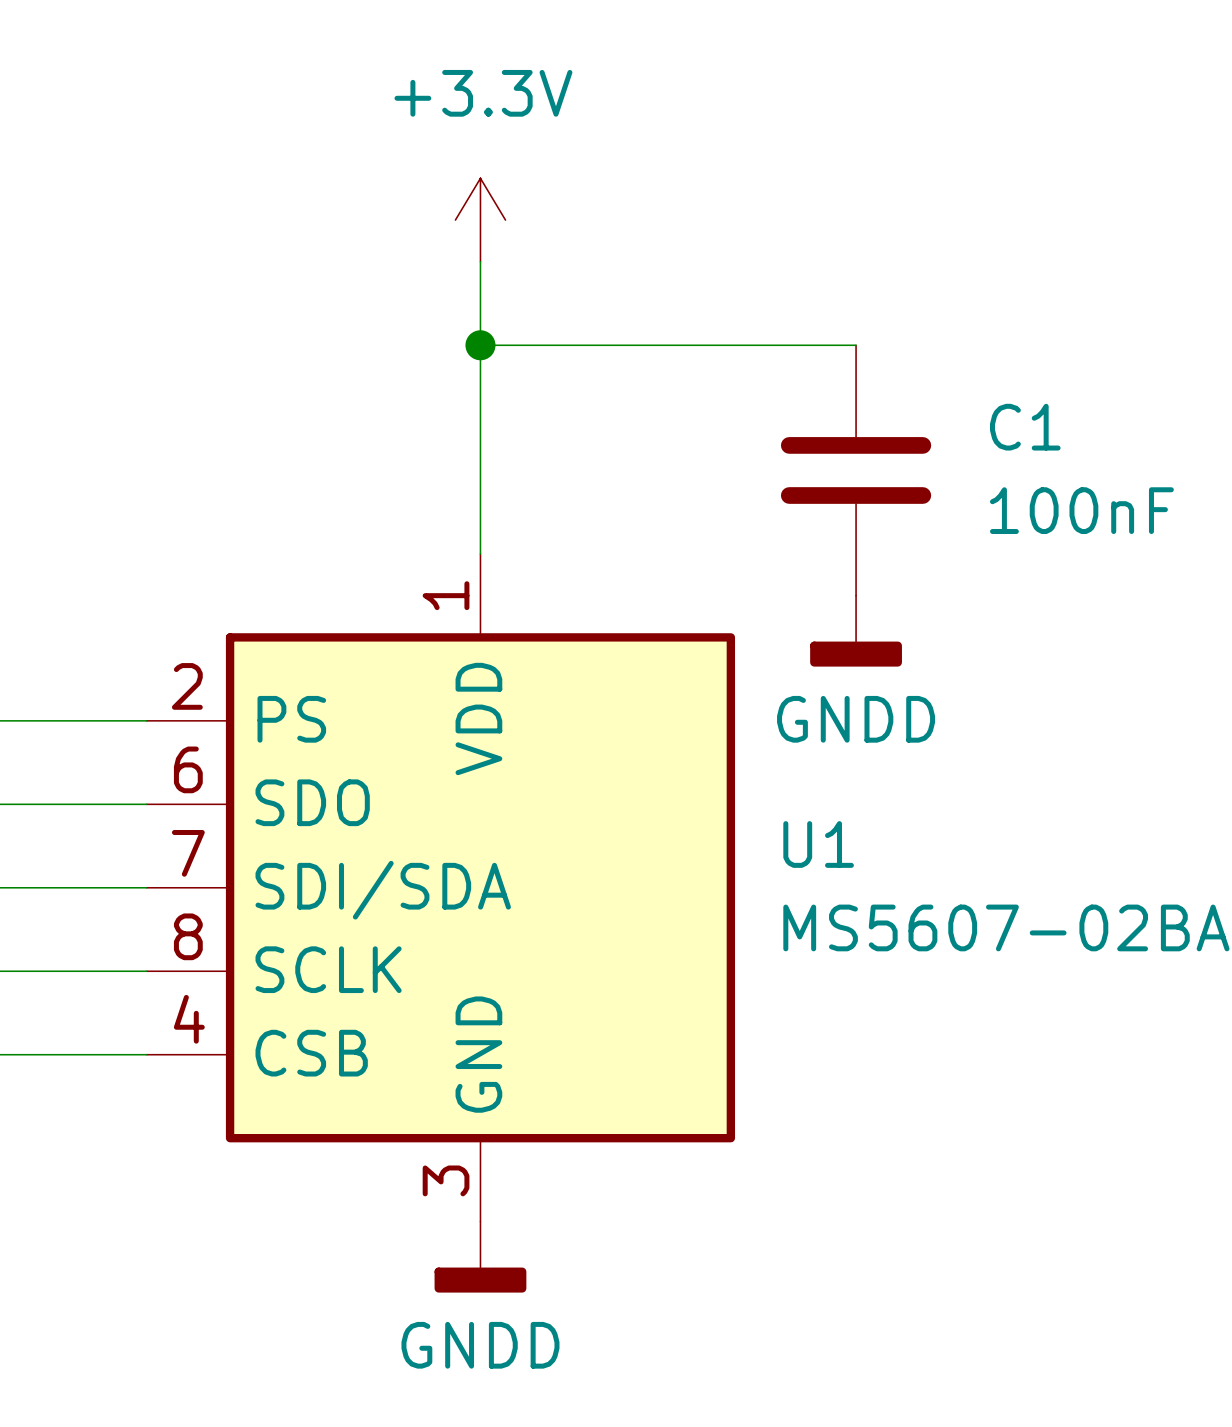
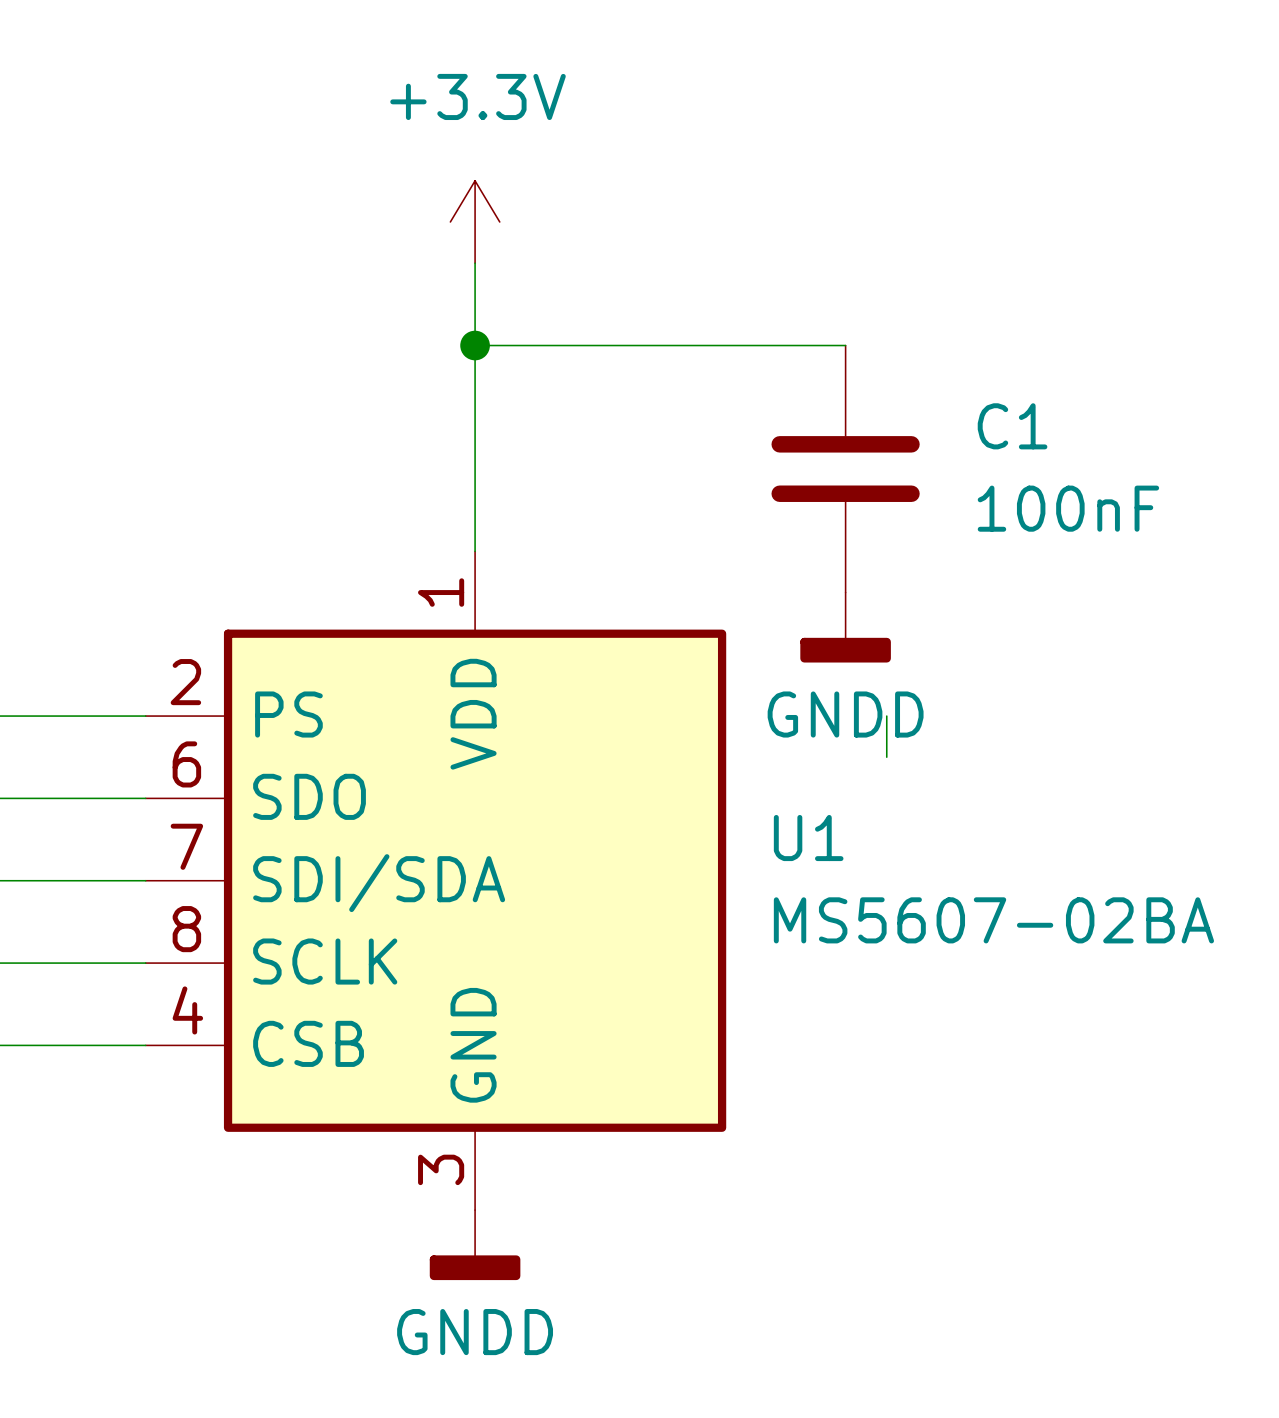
wire: none -> (886, 716) (886, 757)

